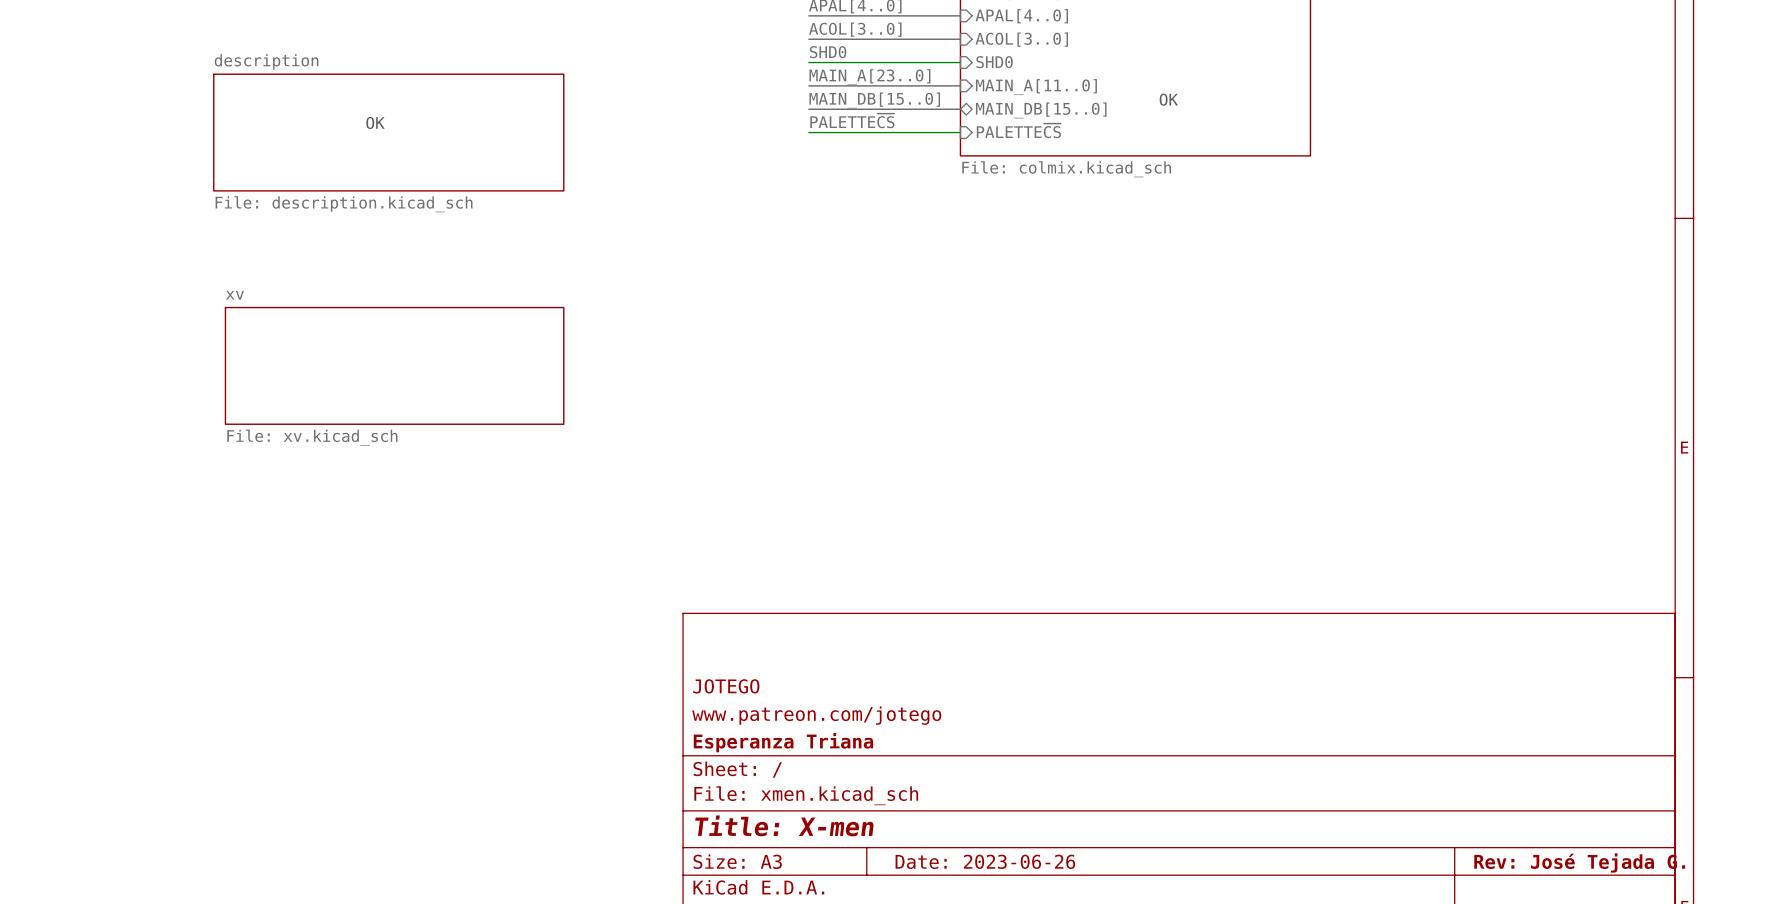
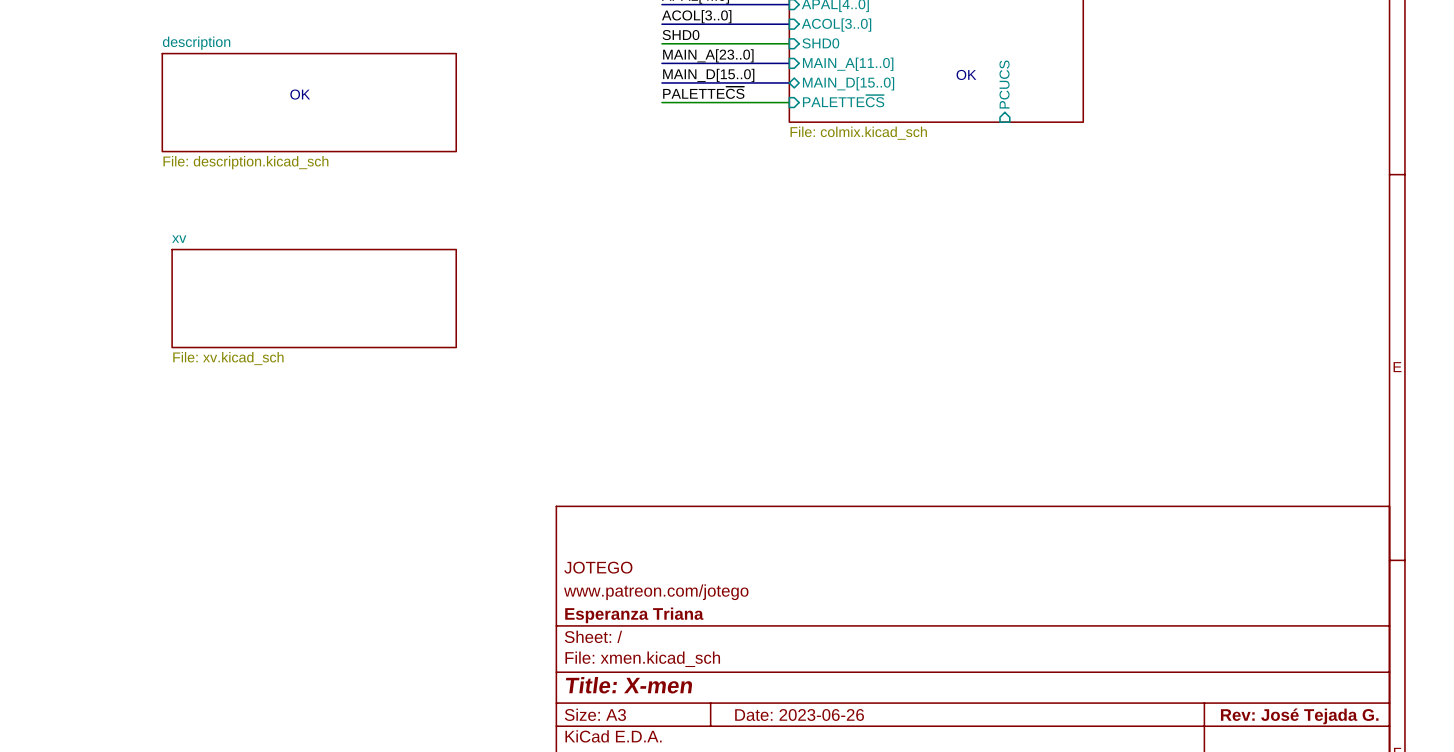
label: MAIN_DB[15..0] (874, 100) -> MAIN_D[15..0] (708, 75)
sheet pin: MAIN_DB[15..0] (1041, 110) -> MAIN_D[15..0] (848, 83)
sheet pin: none -> PCUCS (1004, 84)

